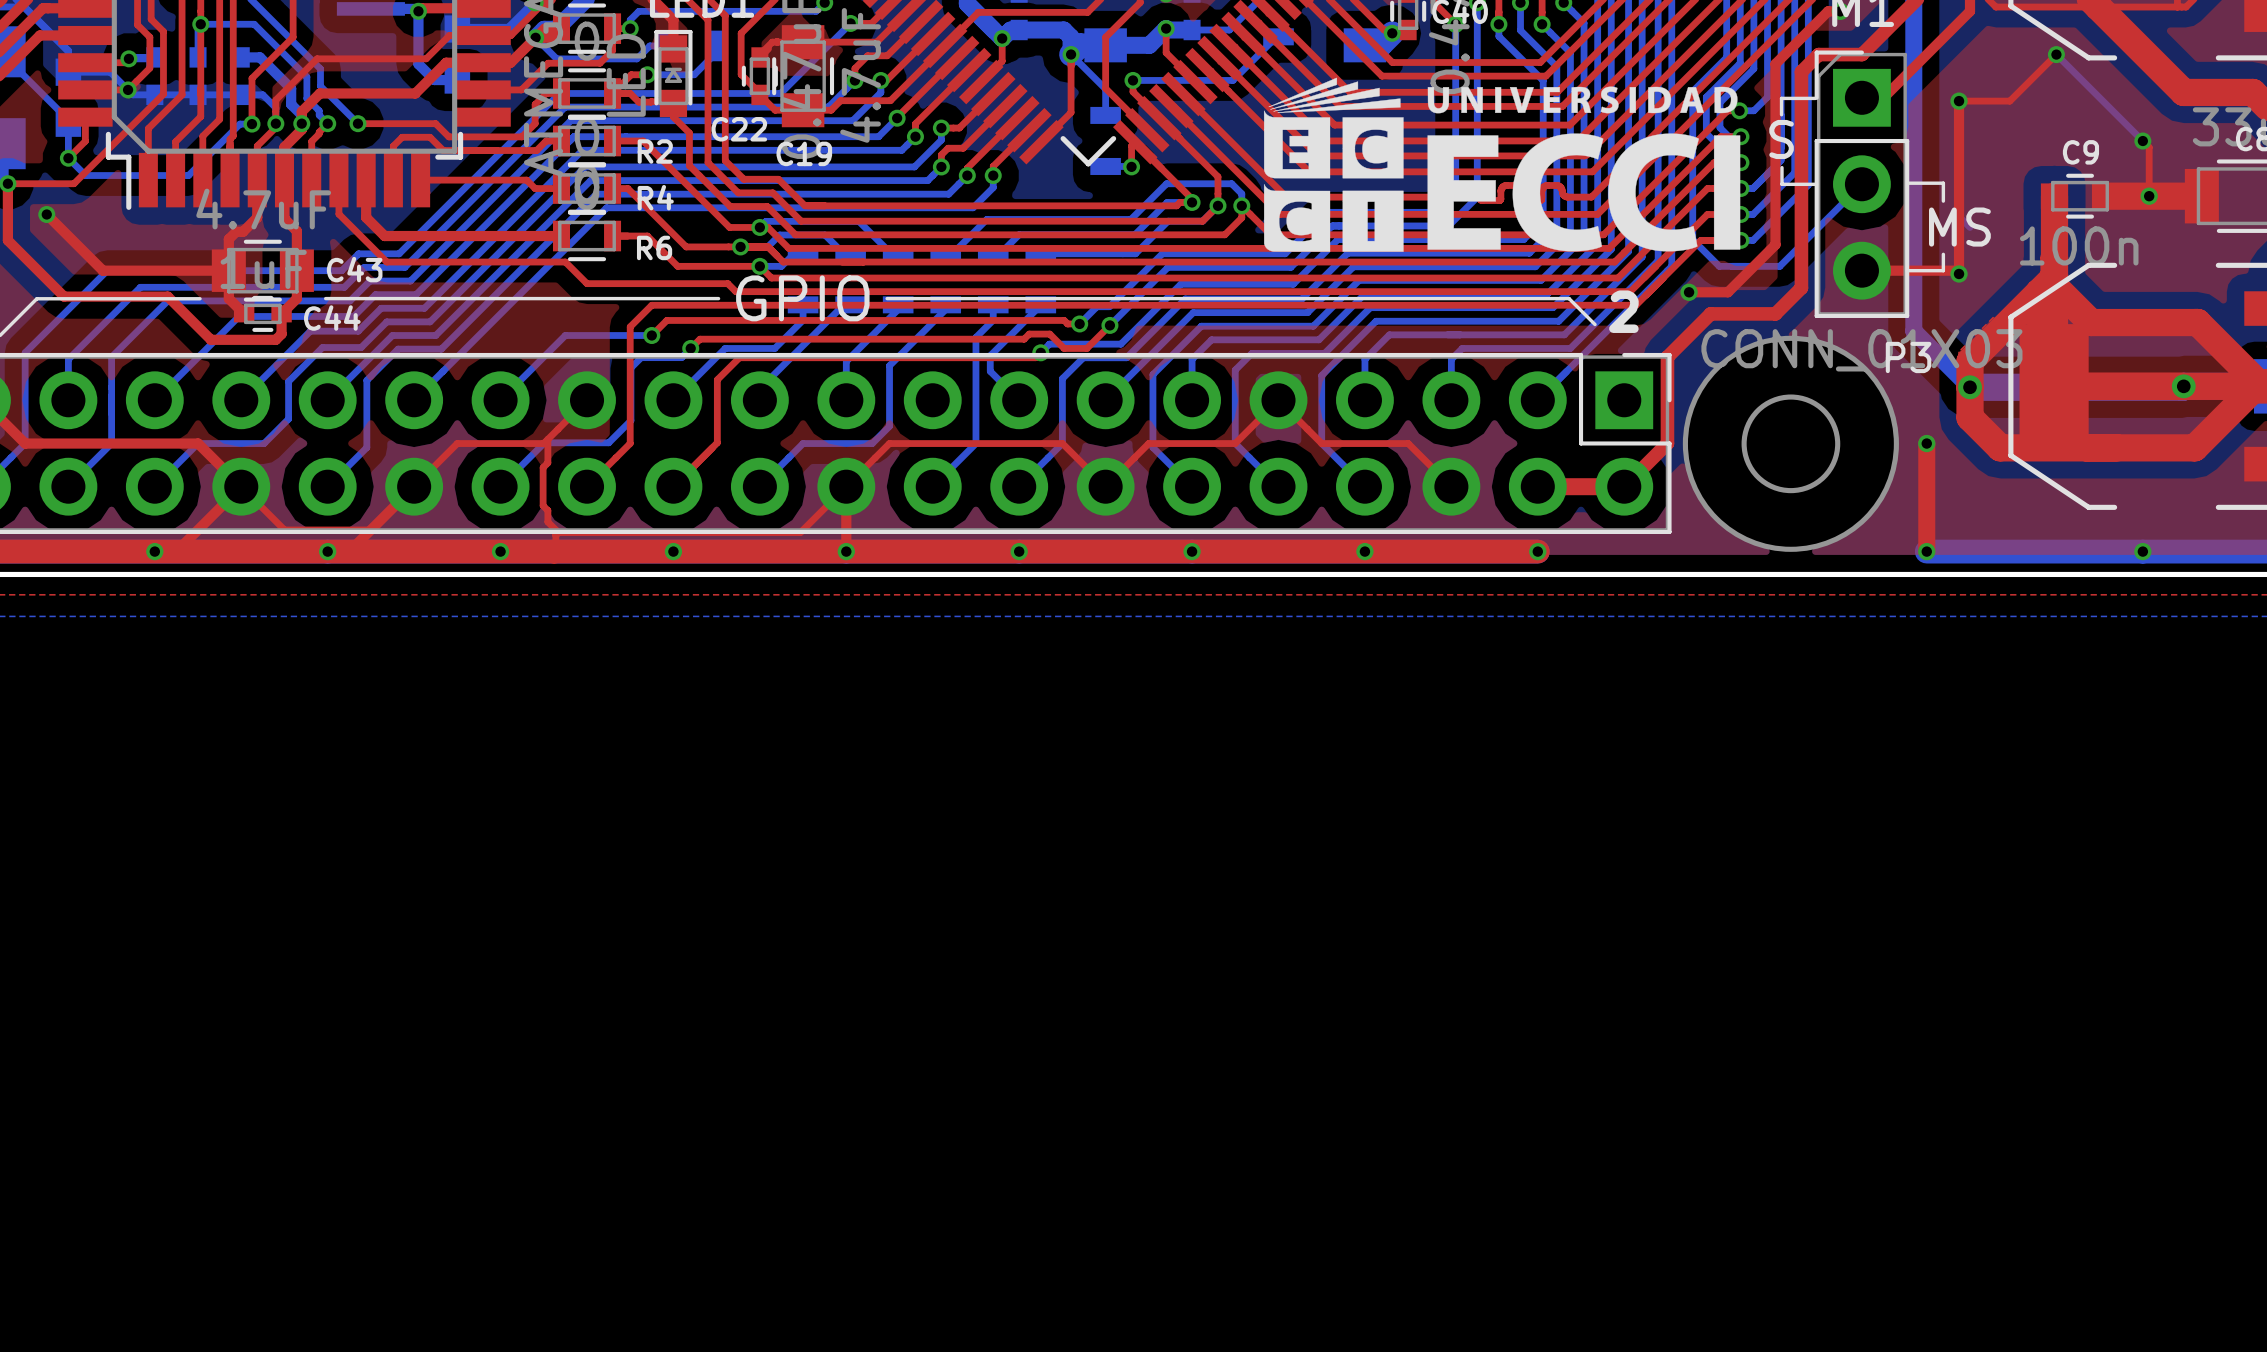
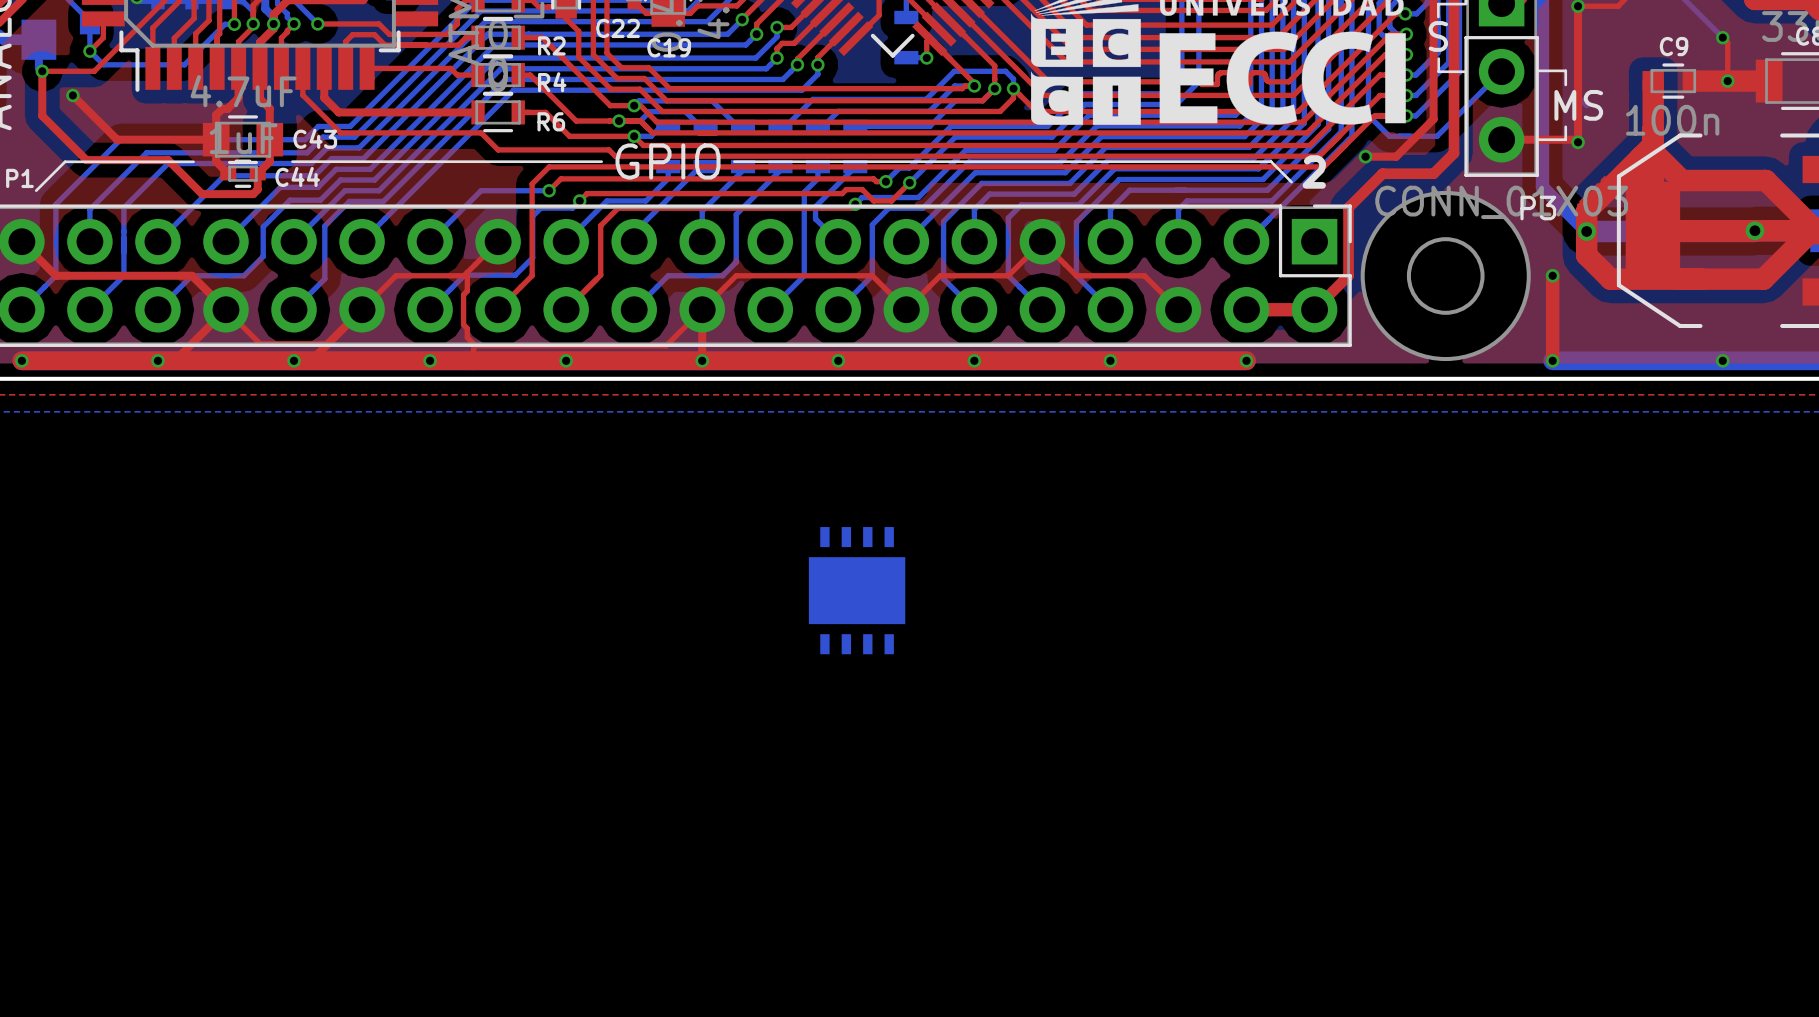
part: none -> (857, 590)

